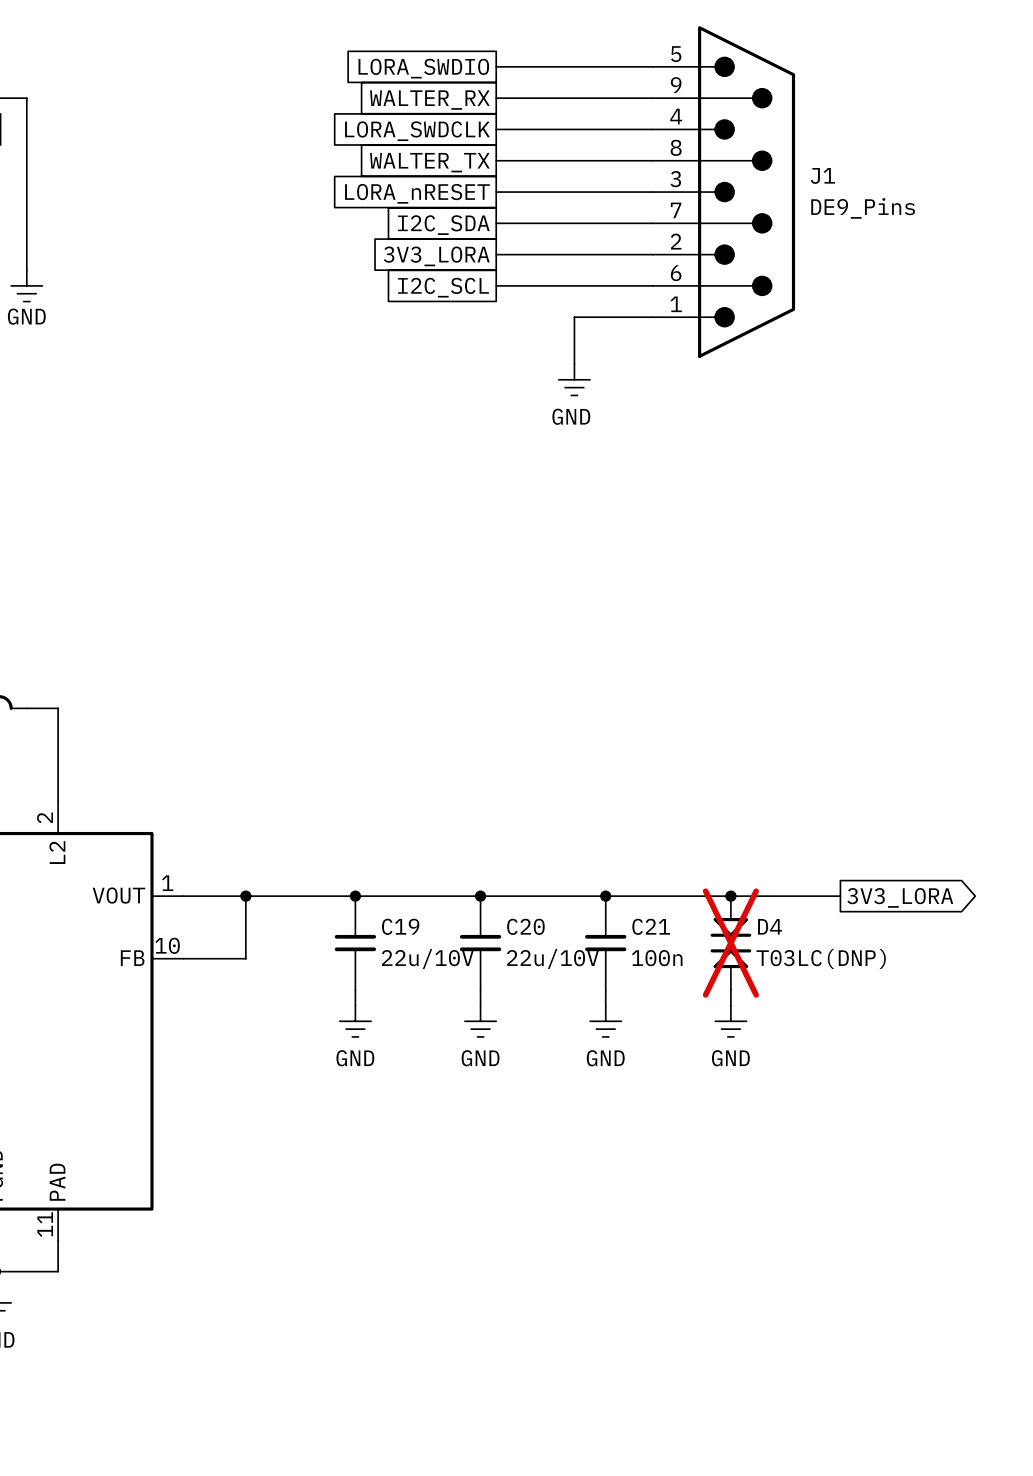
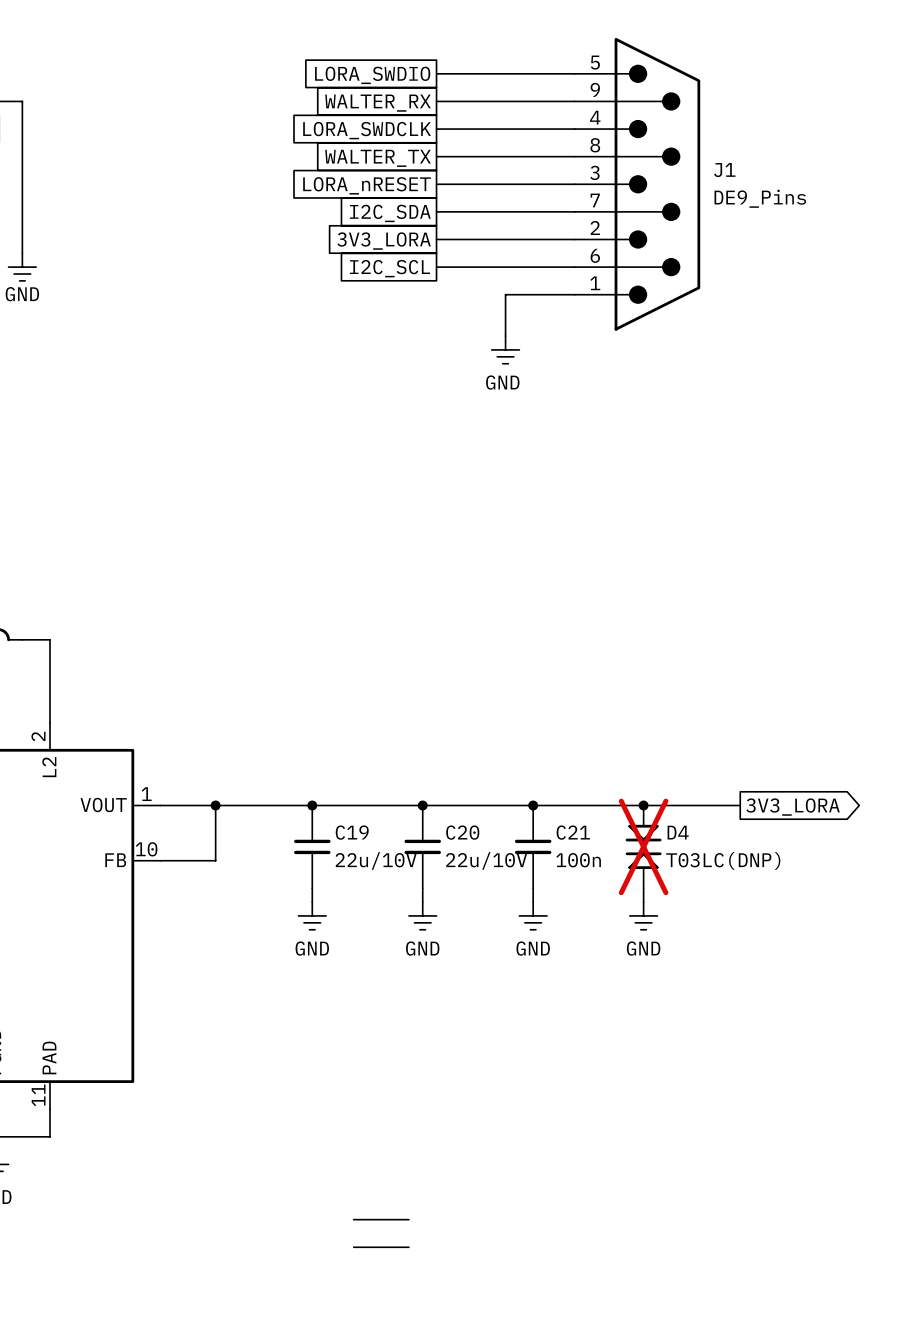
wire: none -> (353, 1219) (408, 1219)
wire: none -> (353, 1247) (408, 1247)

